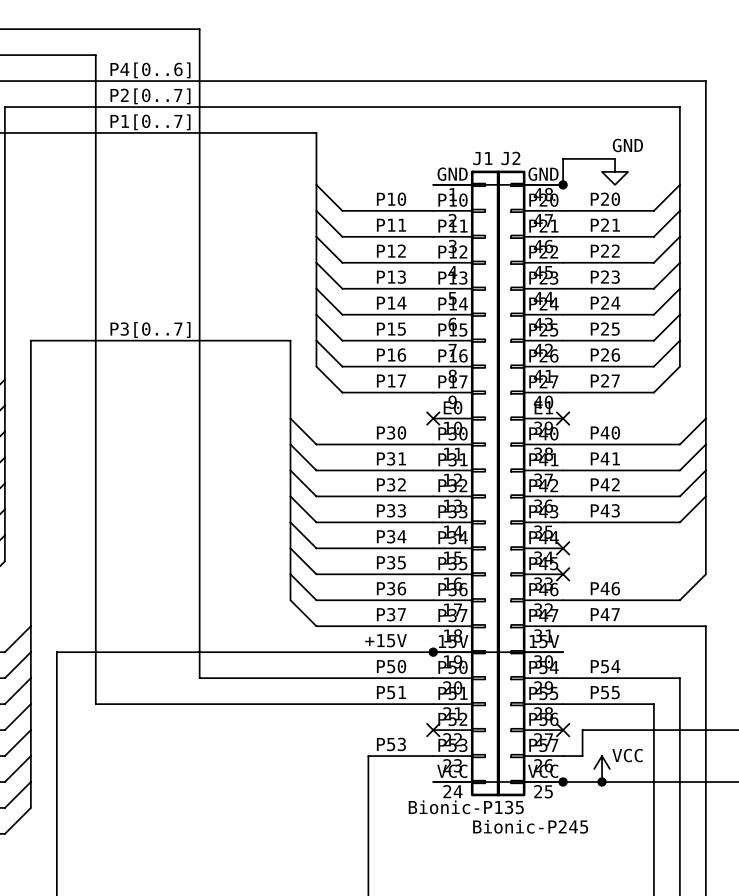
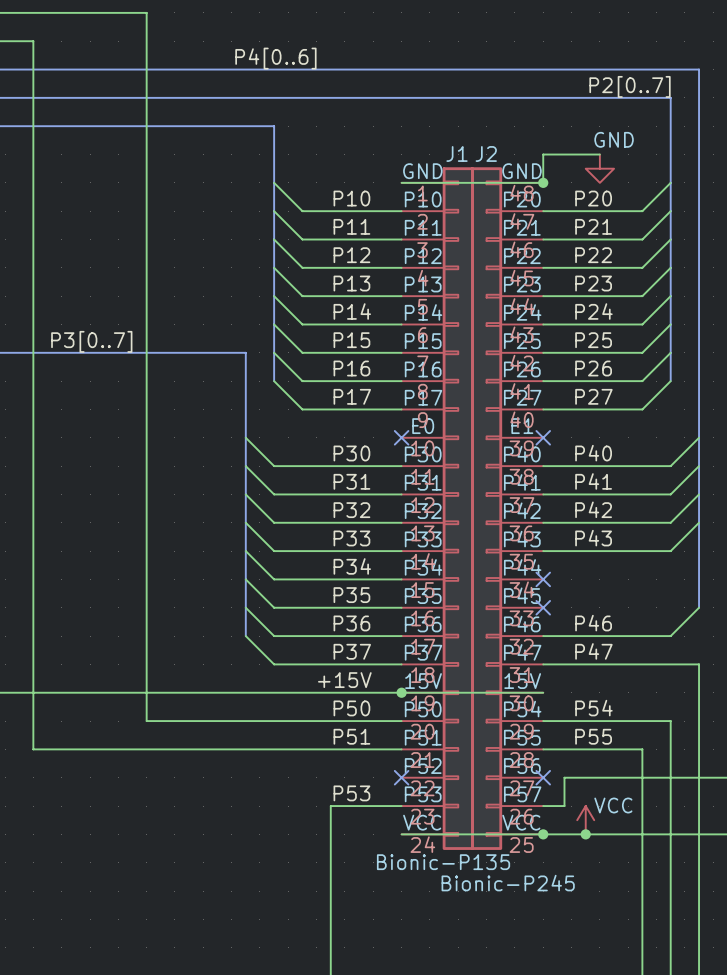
label position: P4[0..6] (150, 70) -> P4[0..6] (275, 58)
label: P2[0..7] (150, 96) -> none
label: none -> P2[0..7] (630, 86)
label: P1[0..7] (150, 122) -> none

